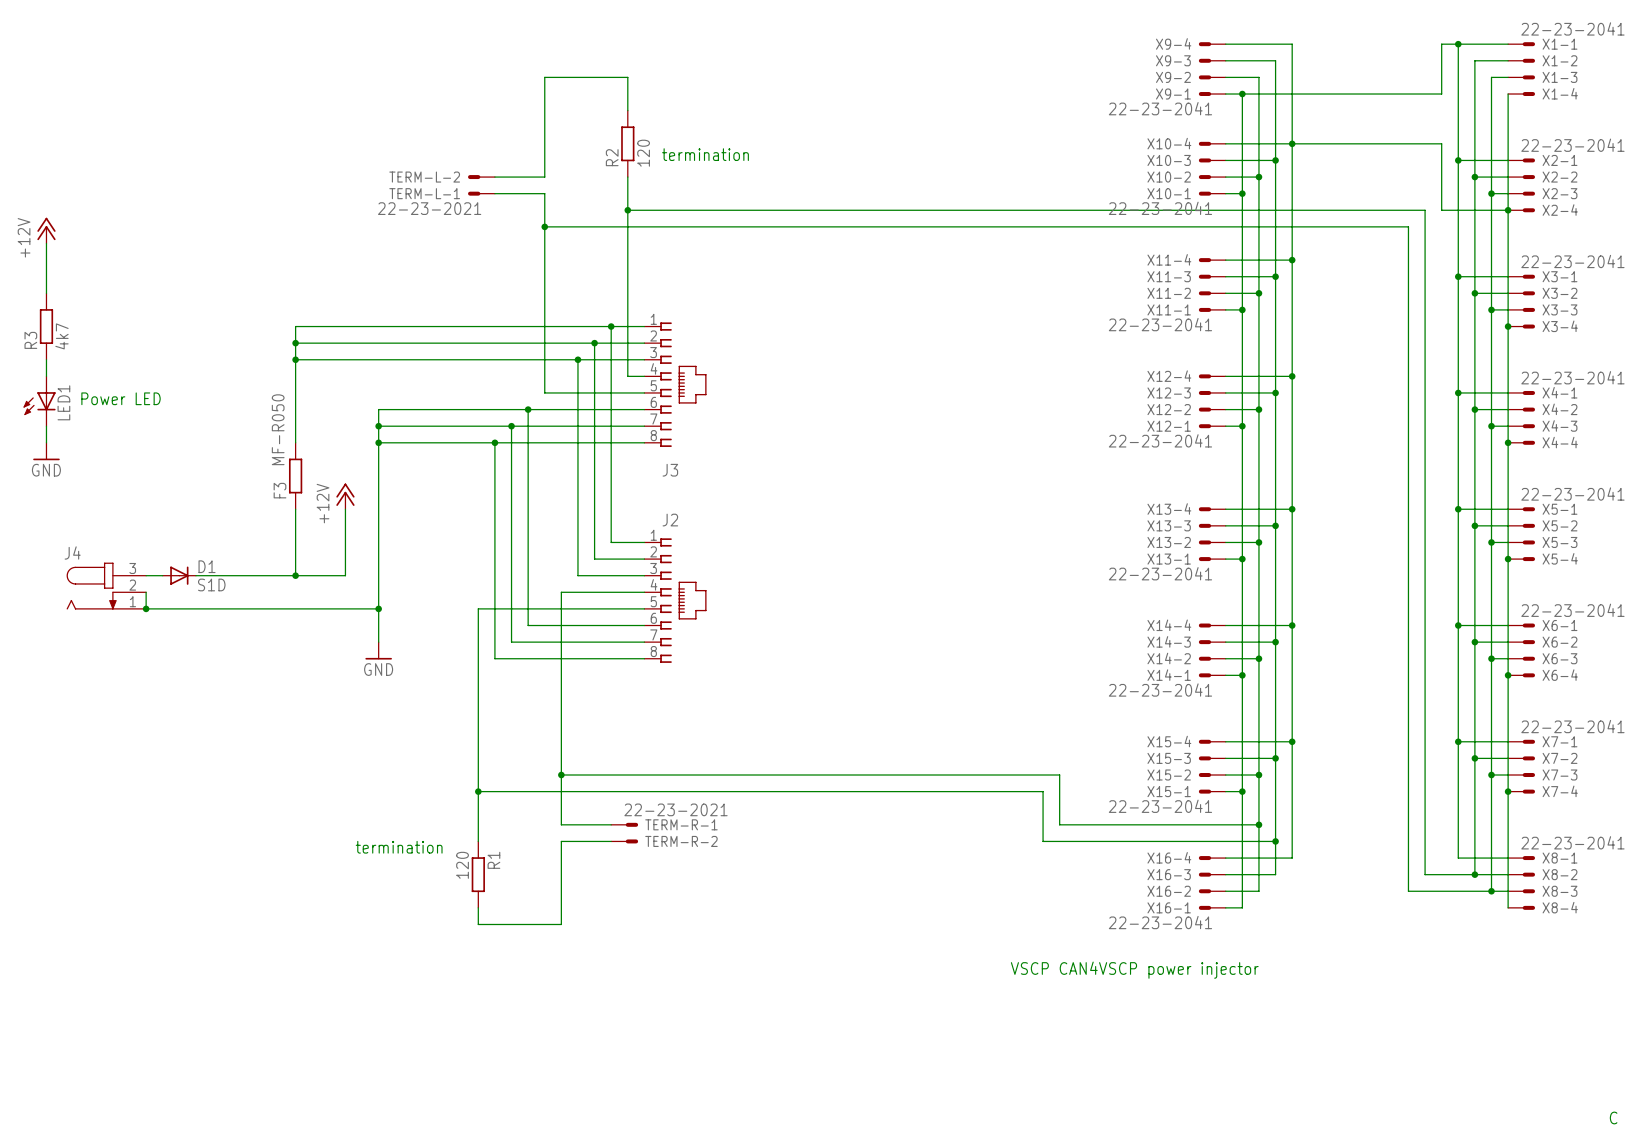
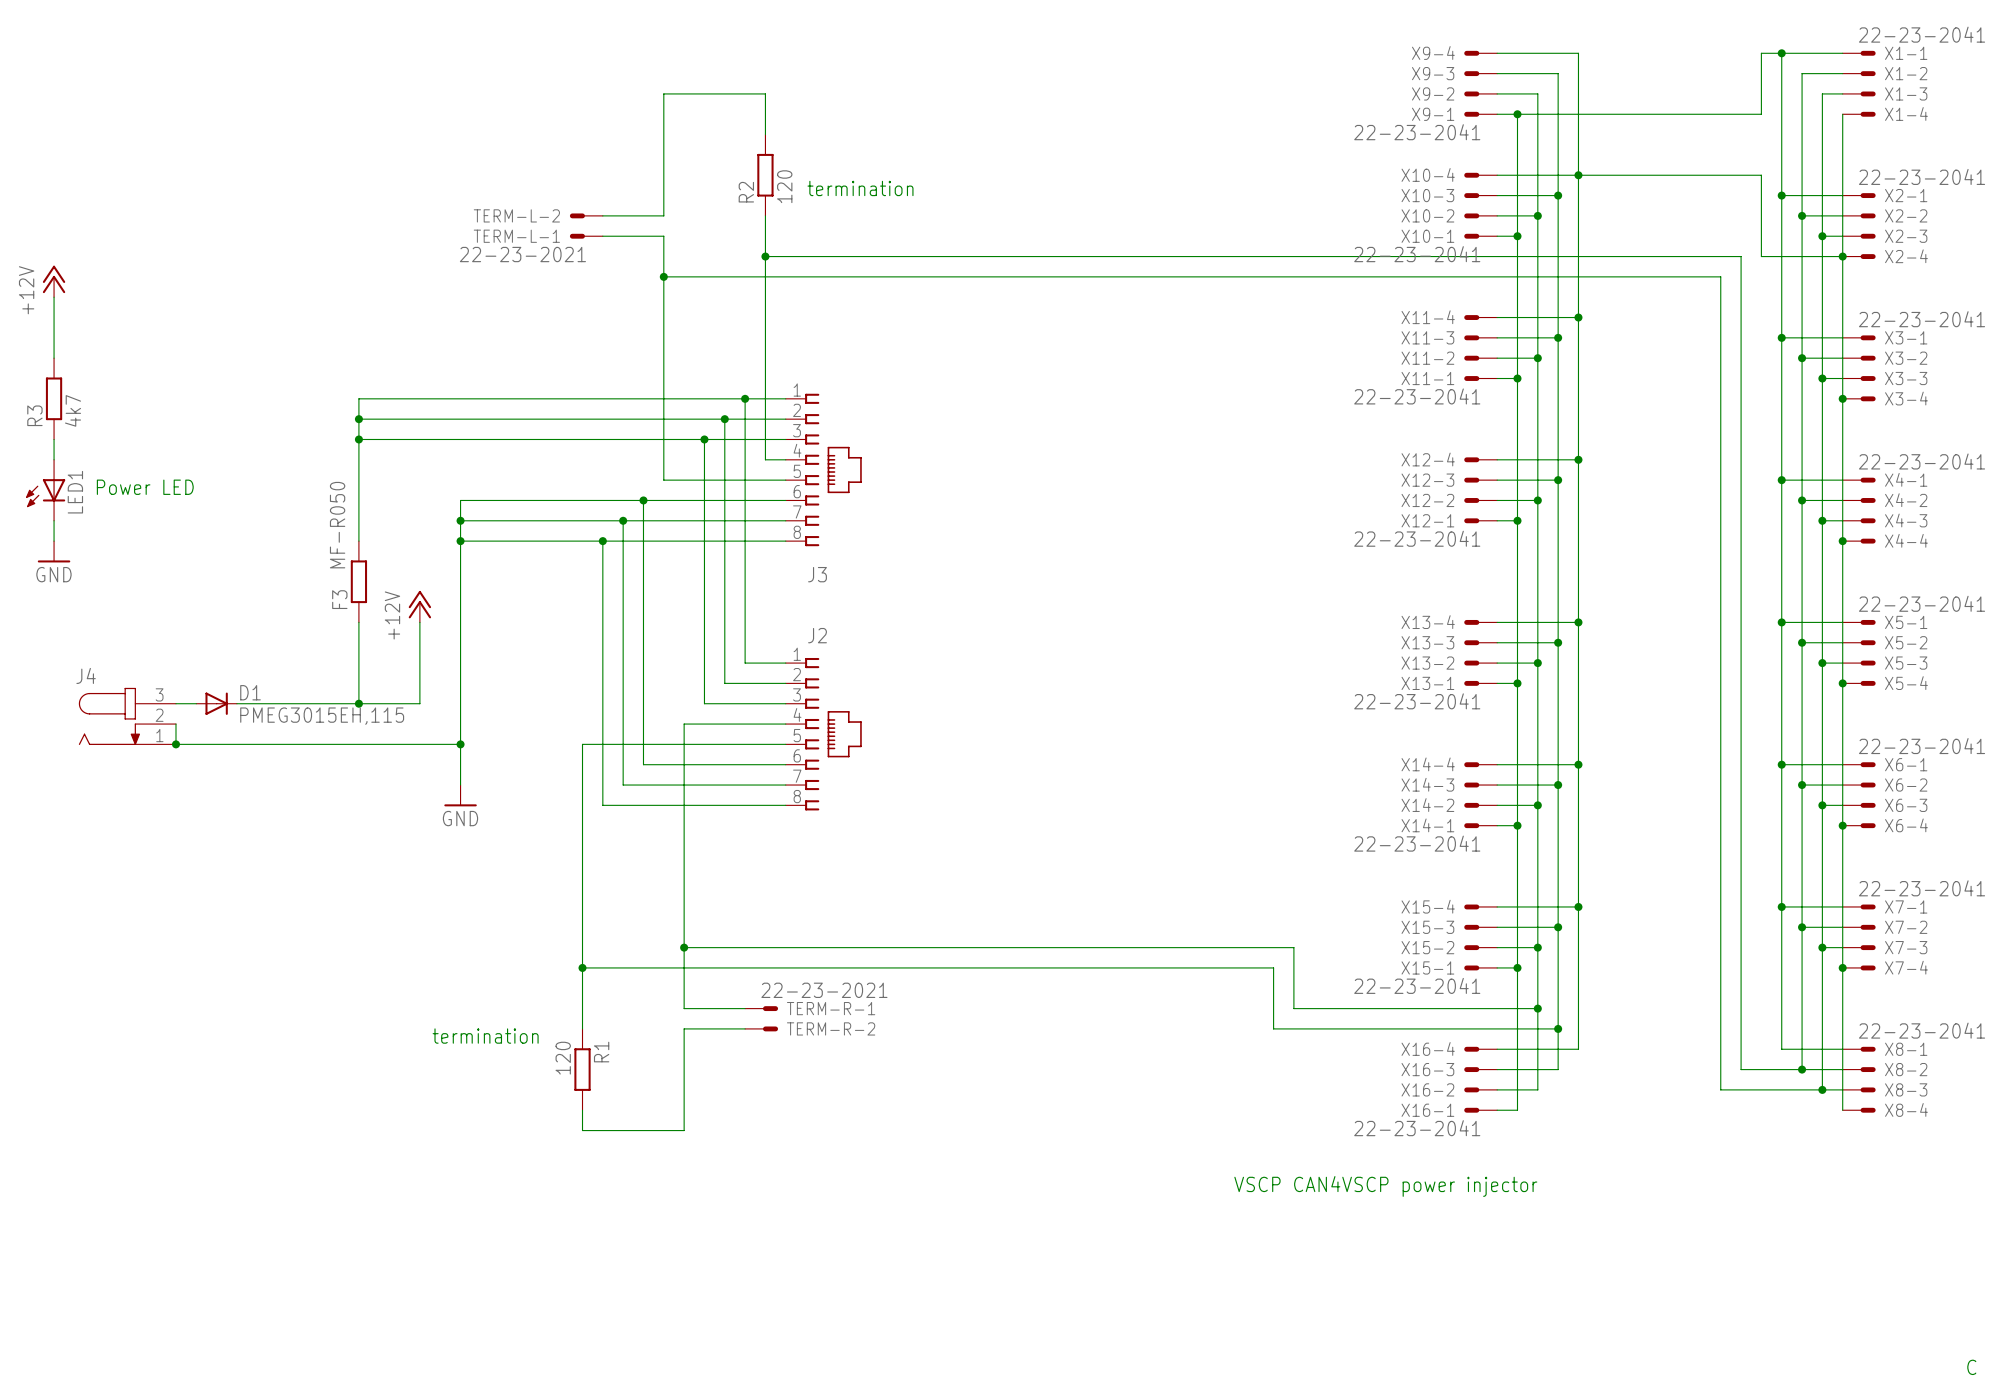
D1 value: S1D (211, 584) -> PMEG3015EH,115 (322, 716)

